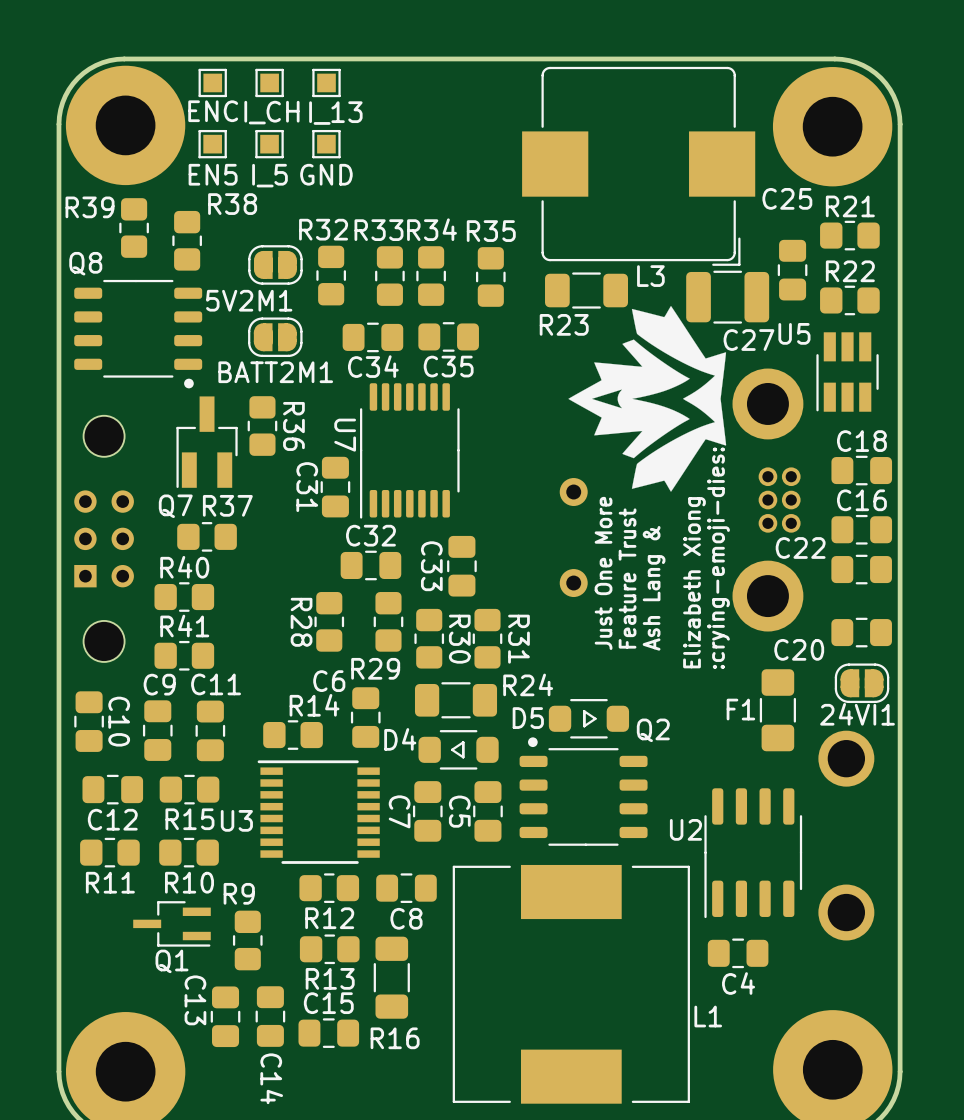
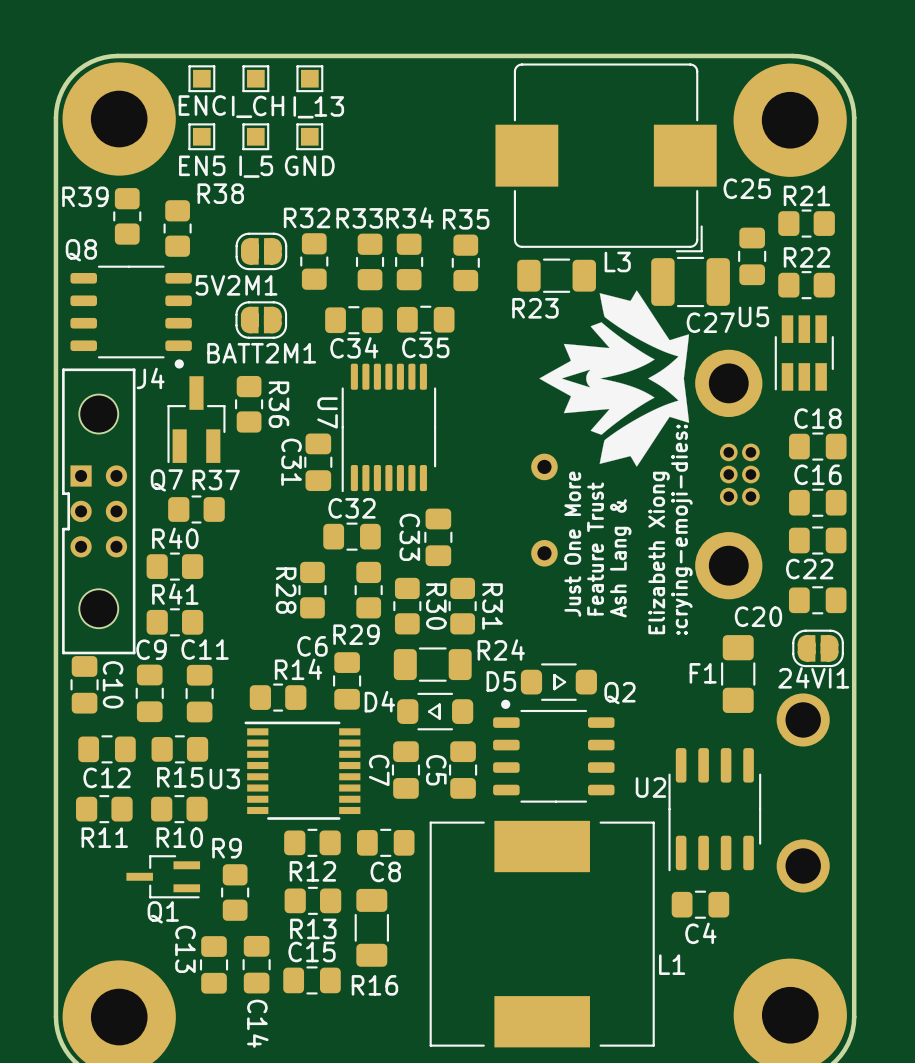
J4 side: top (104, 538) -> bottom (98, 511)
C22 name position: C22 (800, 548) -> C22 (809, 569)

